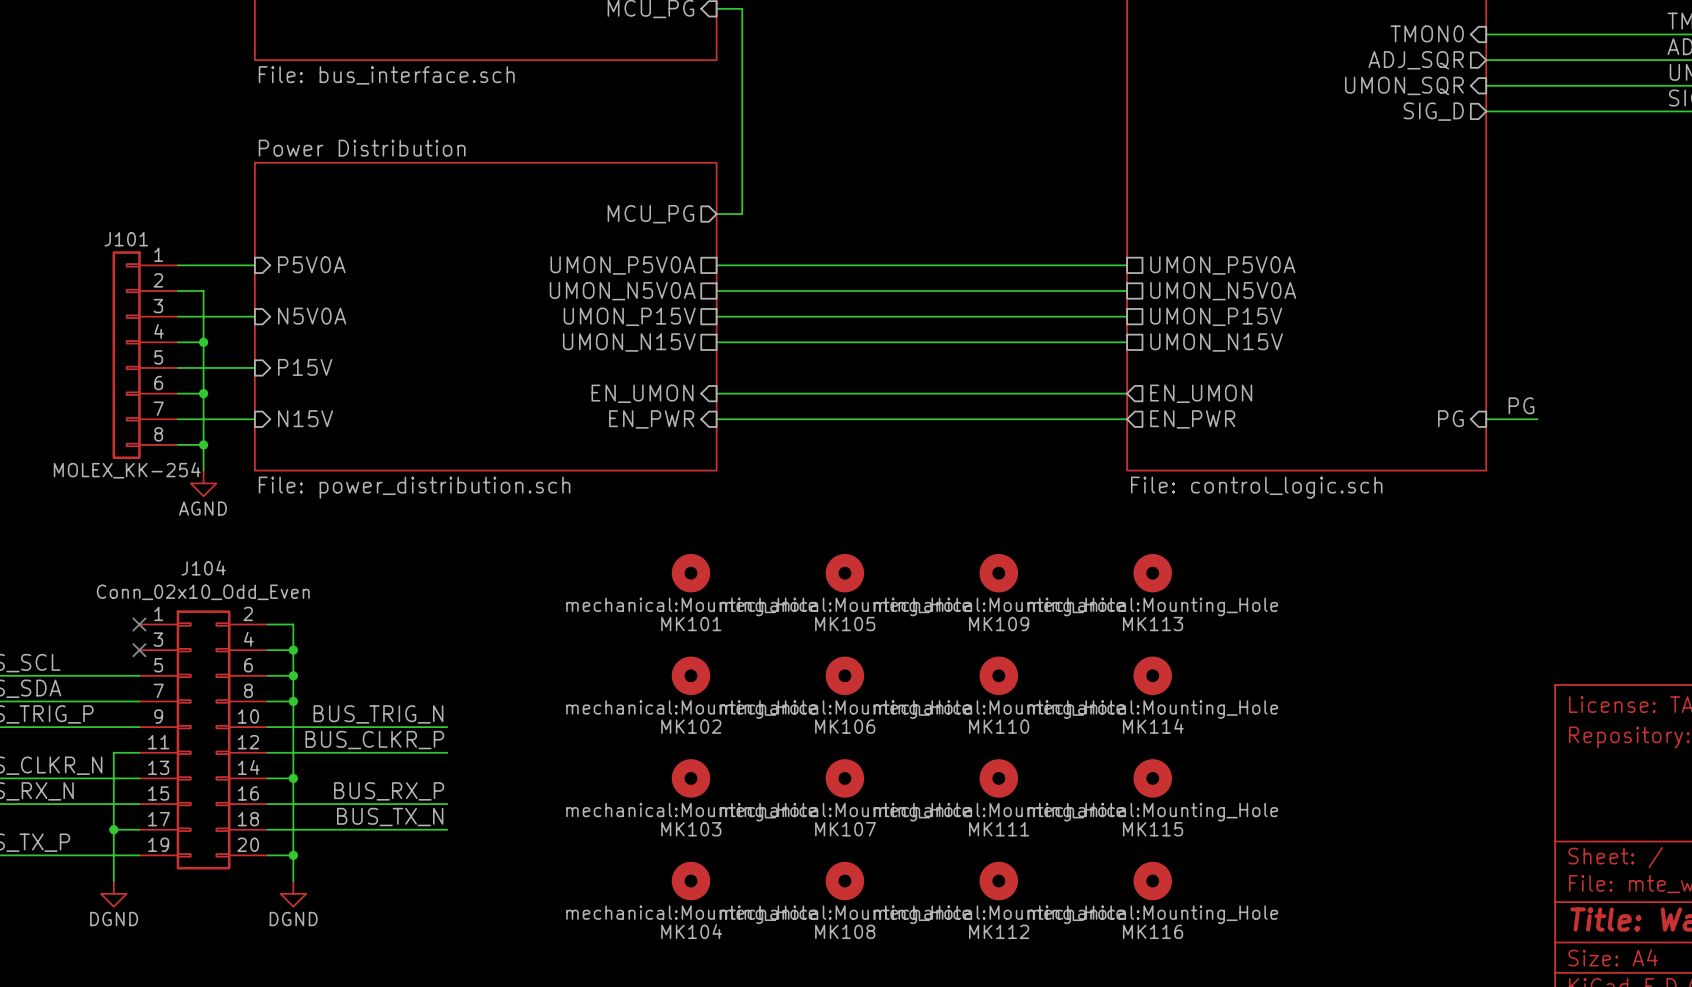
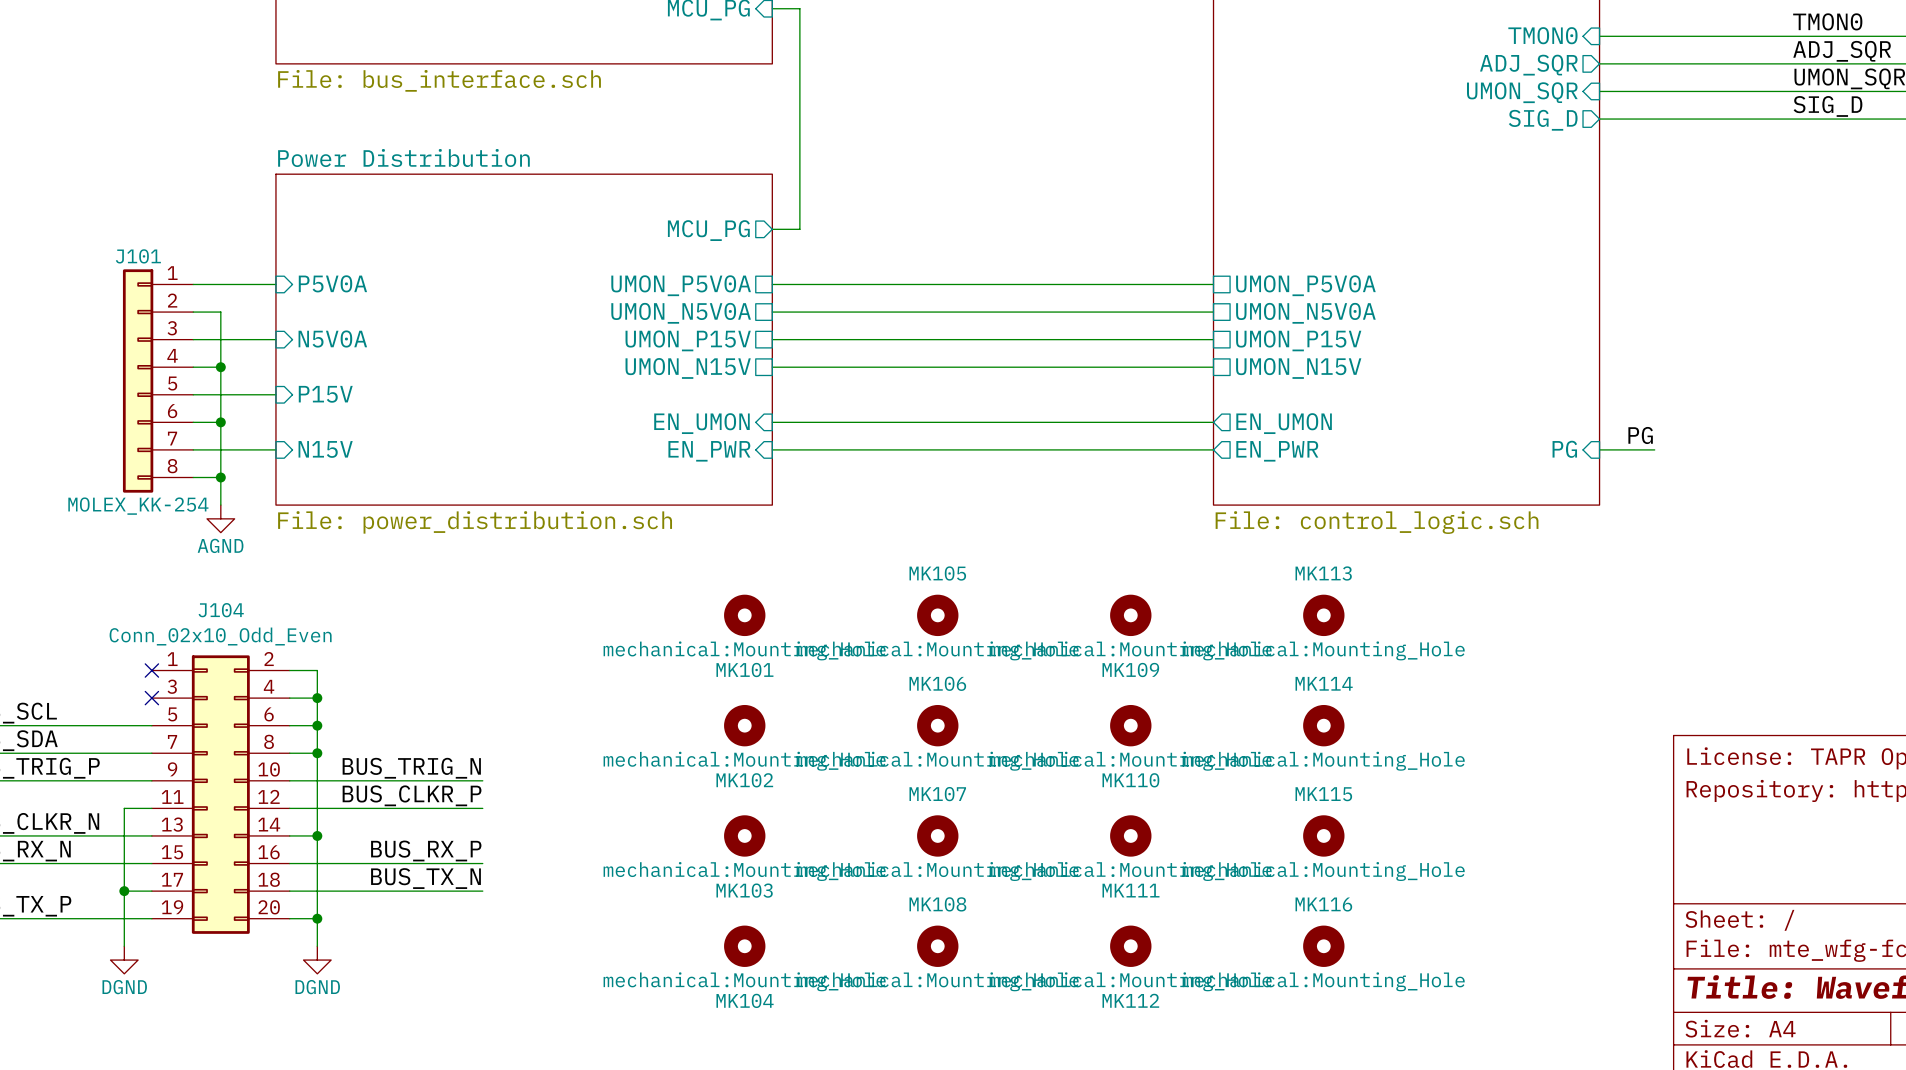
MK105 position: (844, 573) -> (937, 615)
MK109 position: (998, 573) -> (1130, 615)
MK113 position: (1152, 573) -> (1323, 615)
MK105 name position: MK105 (845, 624) -> MK105 (937, 573)
MK113 name position: MK113 (1153, 624) -> MK113 (1323, 573)
MK106 position: (844, 675) -> (937, 725)
MK110 position: (998, 675) -> (1130, 725)
MK114 position: (1152, 675) -> (1323, 725)
MK106 name position: MK106 (845, 726) -> MK106 (937, 683)
MK114 name position: MK114 (1153, 726) -> MK114 (1324, 683)
MK107 position: (844, 778) -> (937, 835)
MK111 position: (998, 778) -> (1130, 835)
MK115 position: (1152, 778) -> (1323, 835)
MK107 name position: MK107 (845, 829) -> MK107 (937, 794)
MK115 name position: MK115 (1153, 829) -> MK115 (1323, 794)
MK108 position: (844, 881) -> (937, 946)
MK112 position: (998, 881) -> (1130, 946)
MK116 position: (1152, 881) -> (1323, 946)
MK108 name position: MK108 (845, 931) -> MK108 (937, 904)
MK116 name position: MK116 (1153, 931) -> MK116 (1323, 904)

